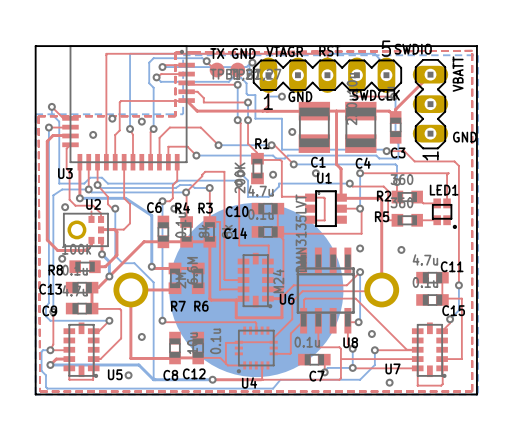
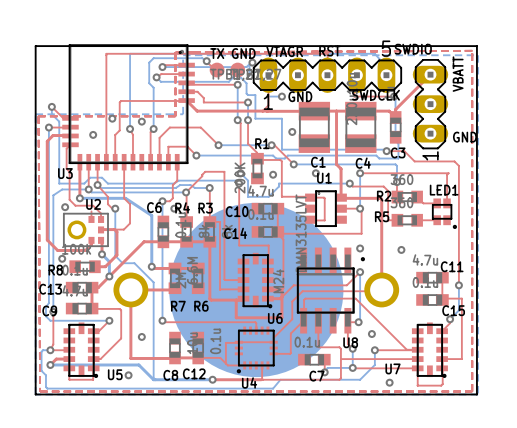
U3 footprint: [62, 45, 195, 171] -> [62, 44, 195, 171]
U8 footprint: [296, 247, 355, 334] -> [296, 247, 365, 334]
U6 footprint: [237, 252, 274, 309] -> [237, 252, 274, 309]
U5 footprint: [63, 322, 100, 378] -> [63, 322, 100, 378]
U7 footprint: [411, 322, 448, 378] -> [411, 322, 448, 378]
U4 footprint: [234, 326, 278, 374] -> [234, 326, 278, 374]

